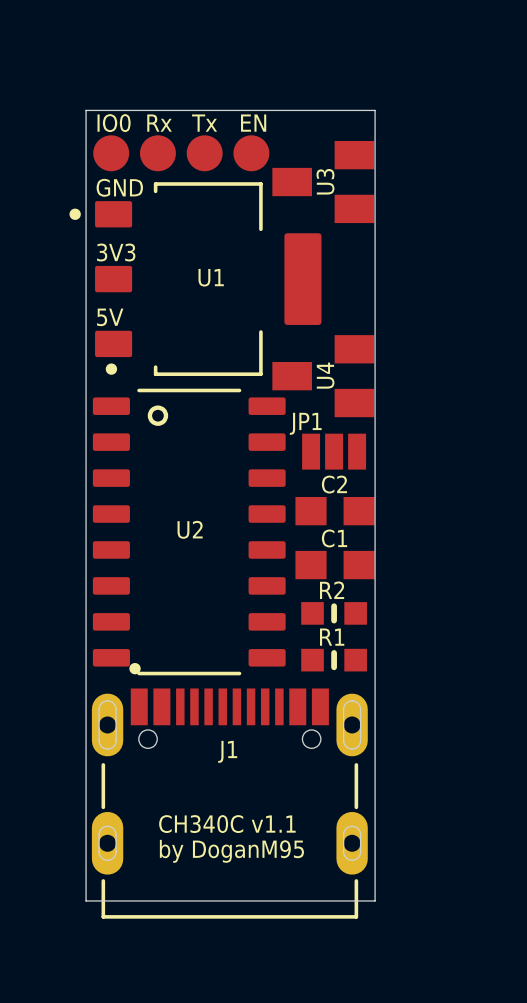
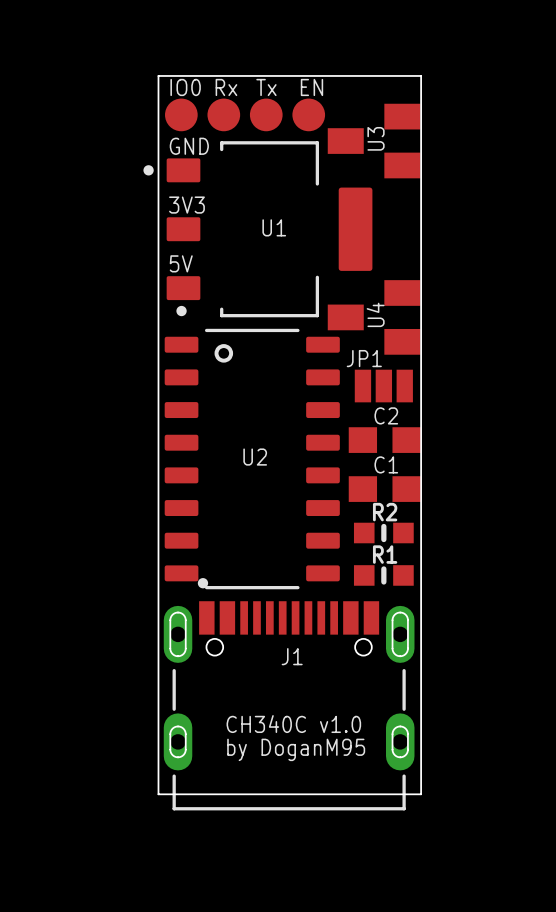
text: CH340C v1.1 (227, 824) -> CH340C v1.0 (293, 724)

